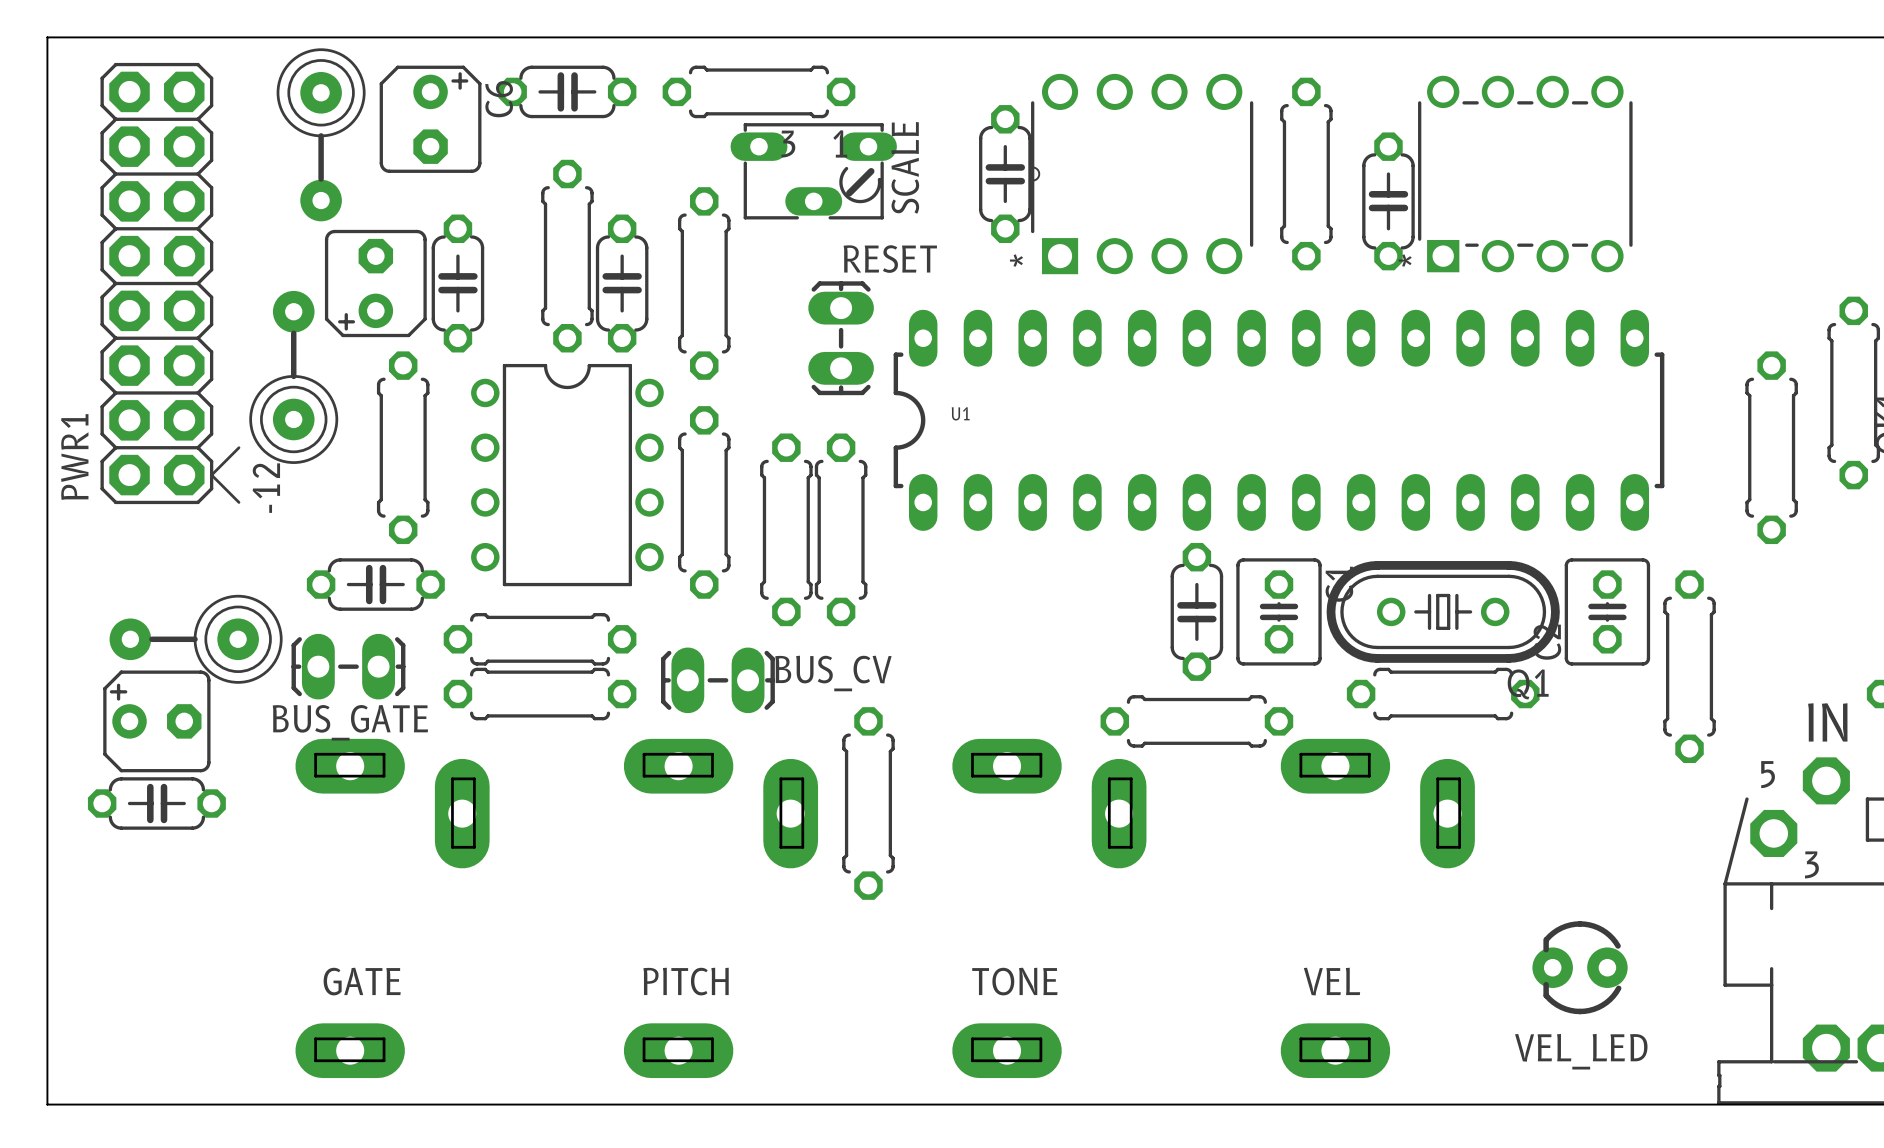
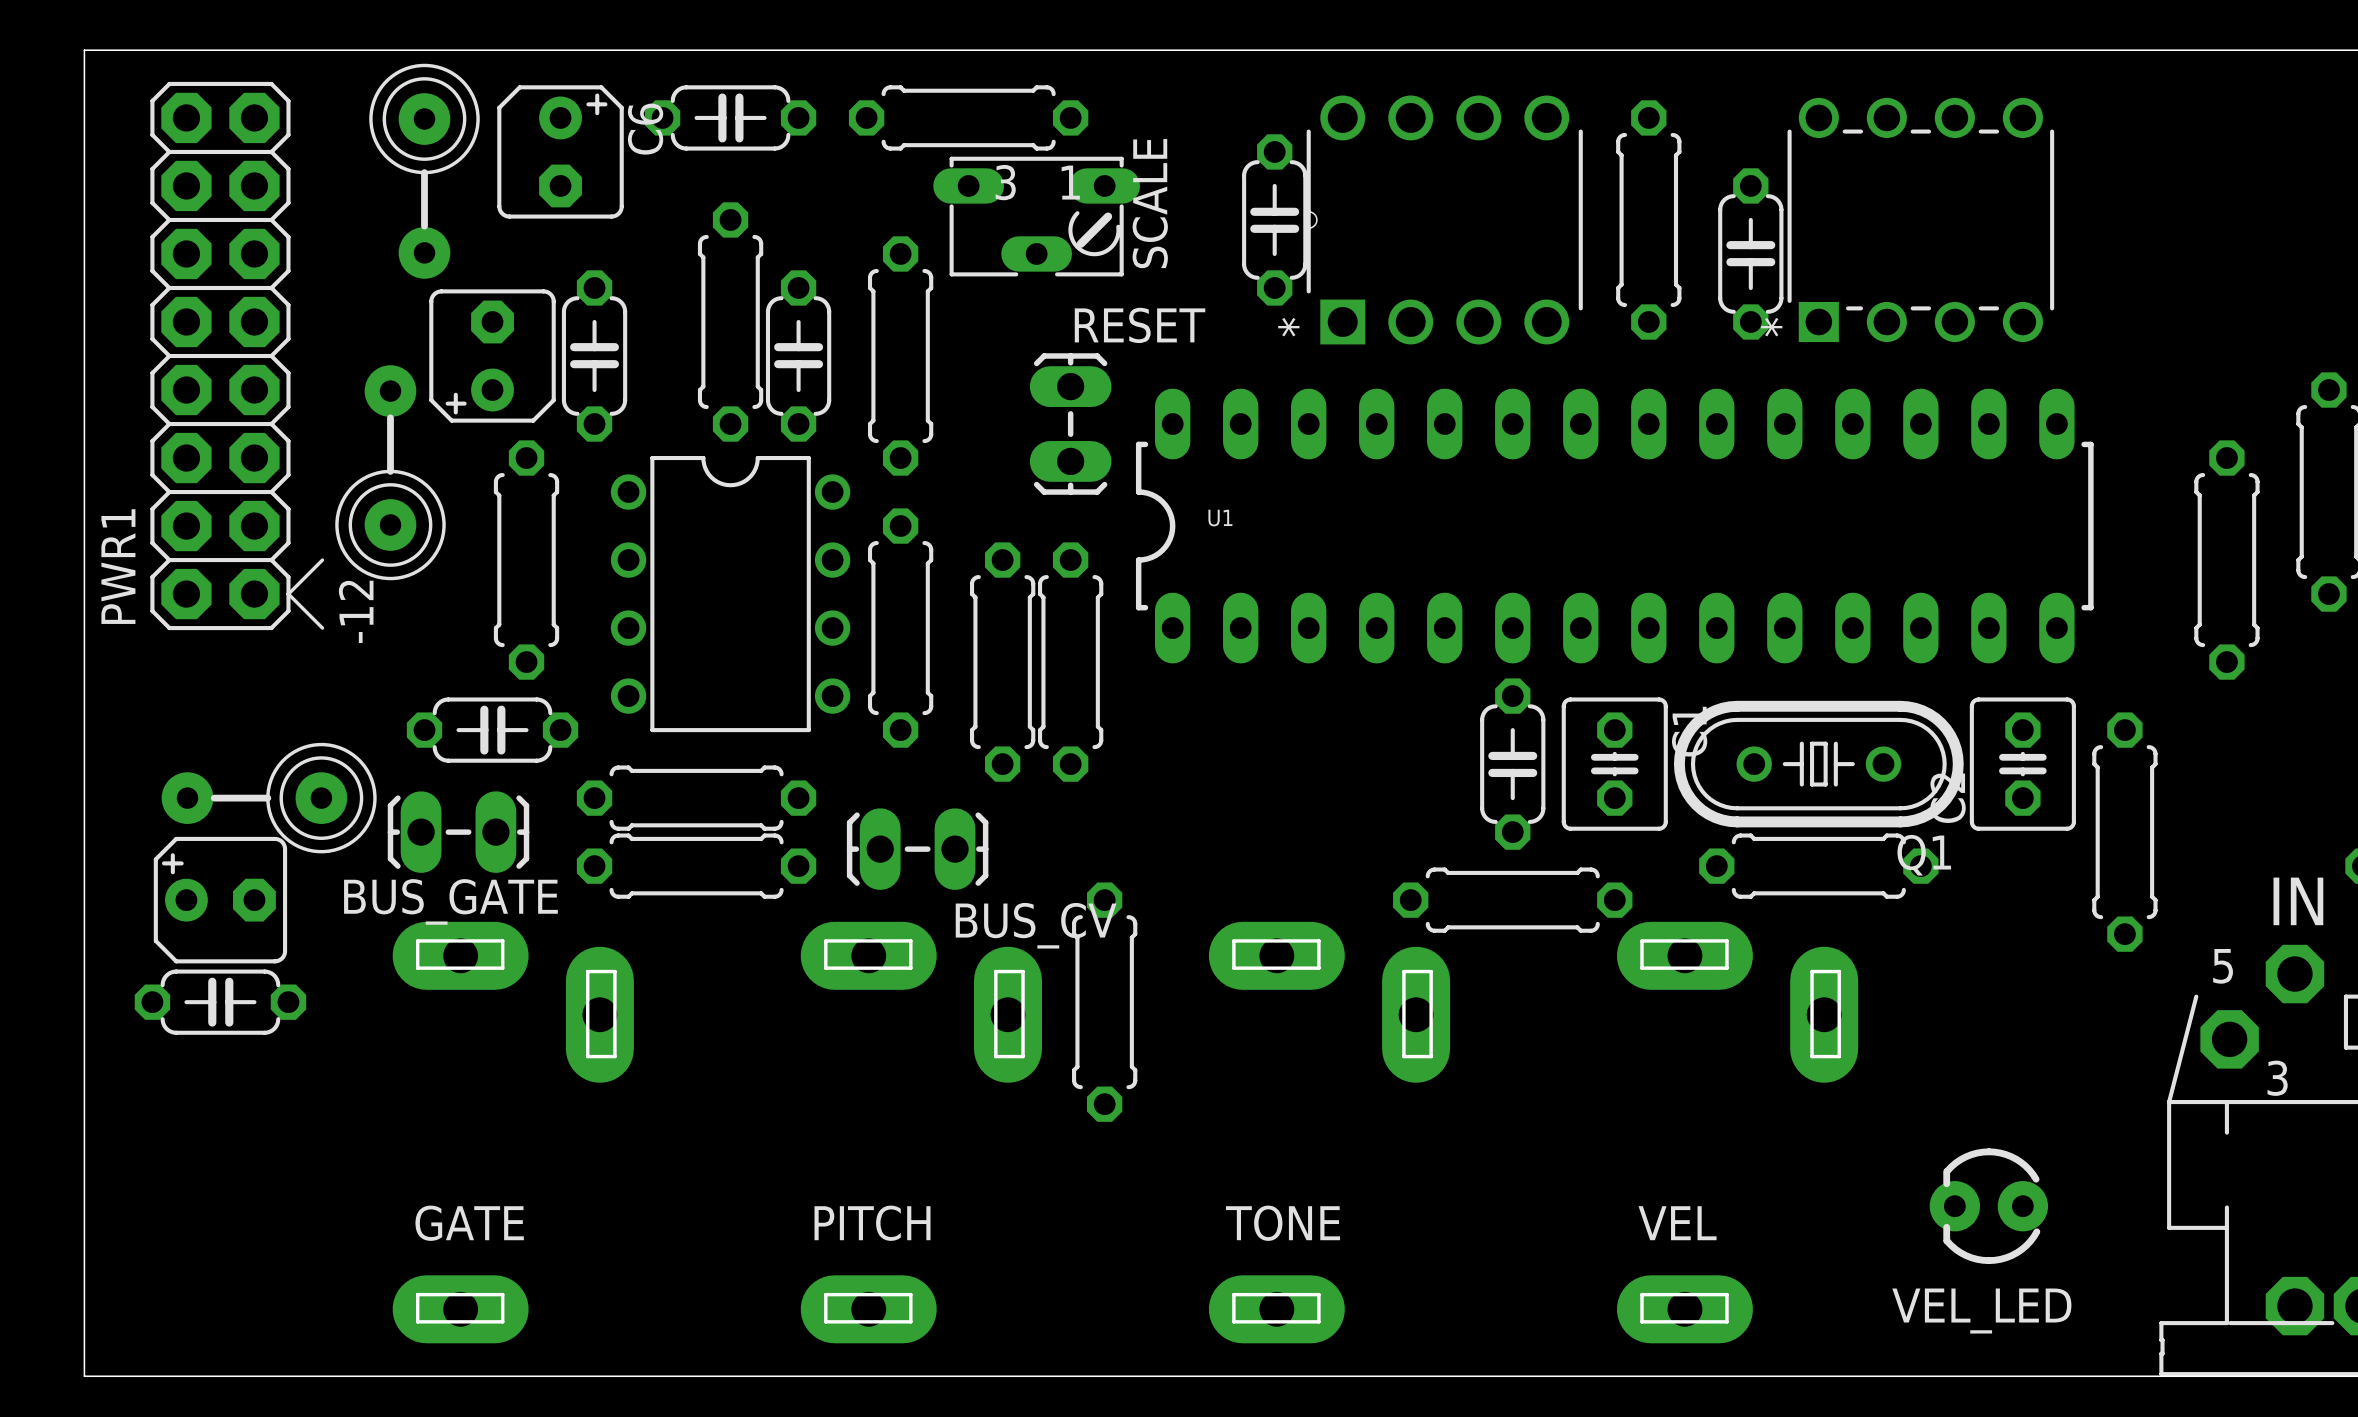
BUS_CV name position: BUS_CV (833, 673) -> BUS_CV (1036, 925)

